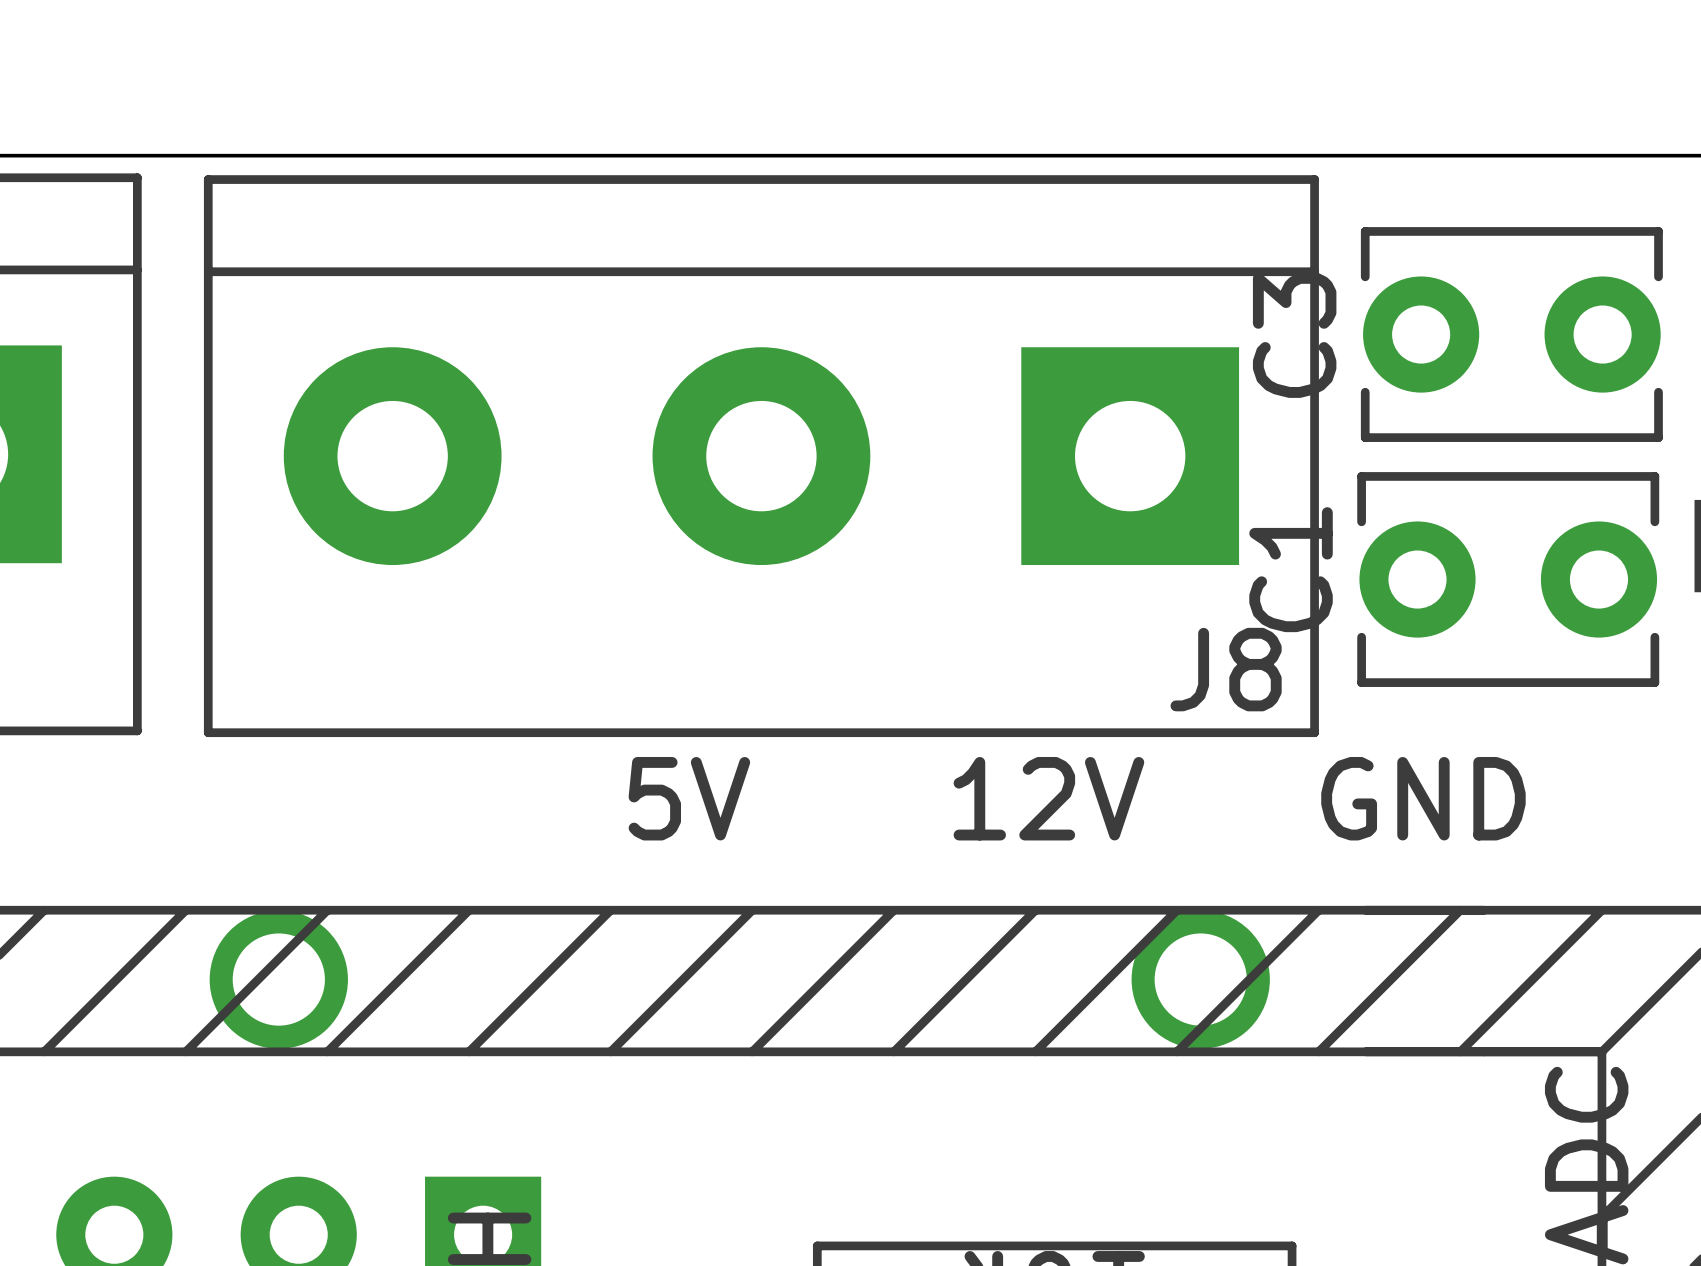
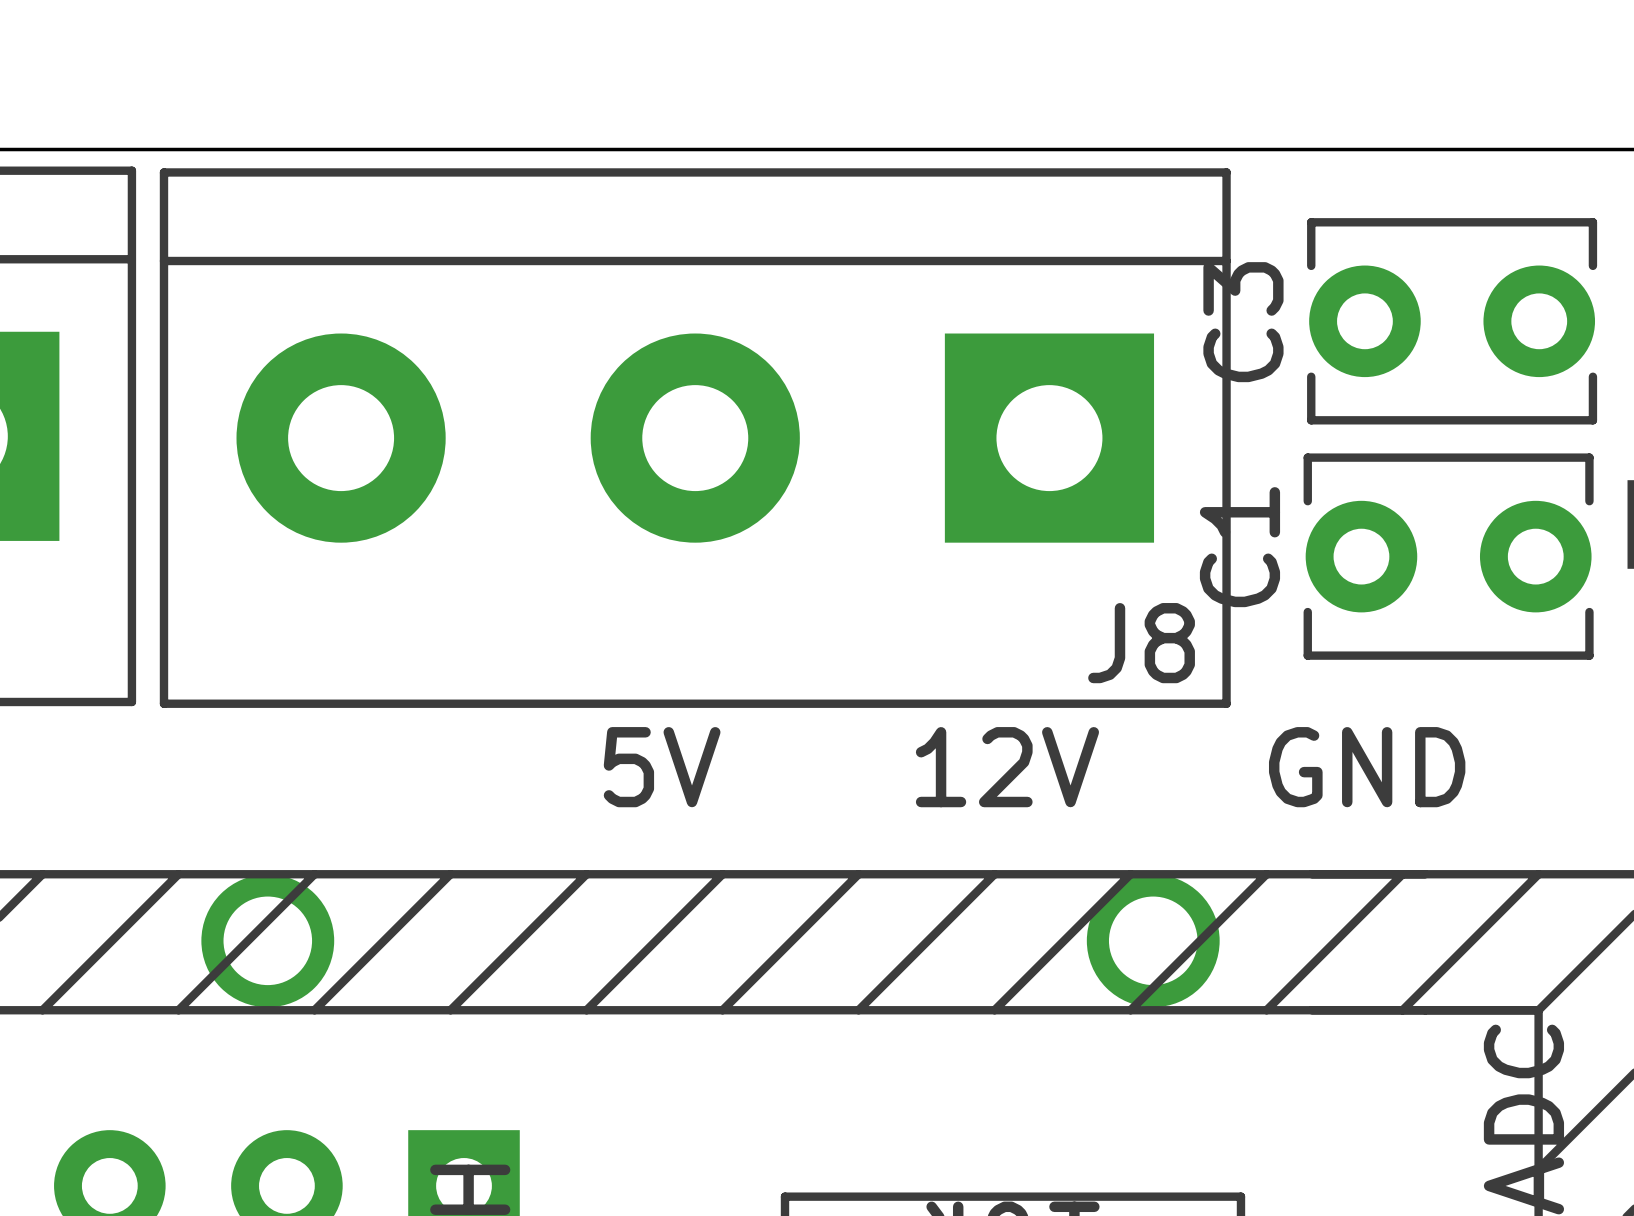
J8 position: (761, 456) -> (695, 438)

